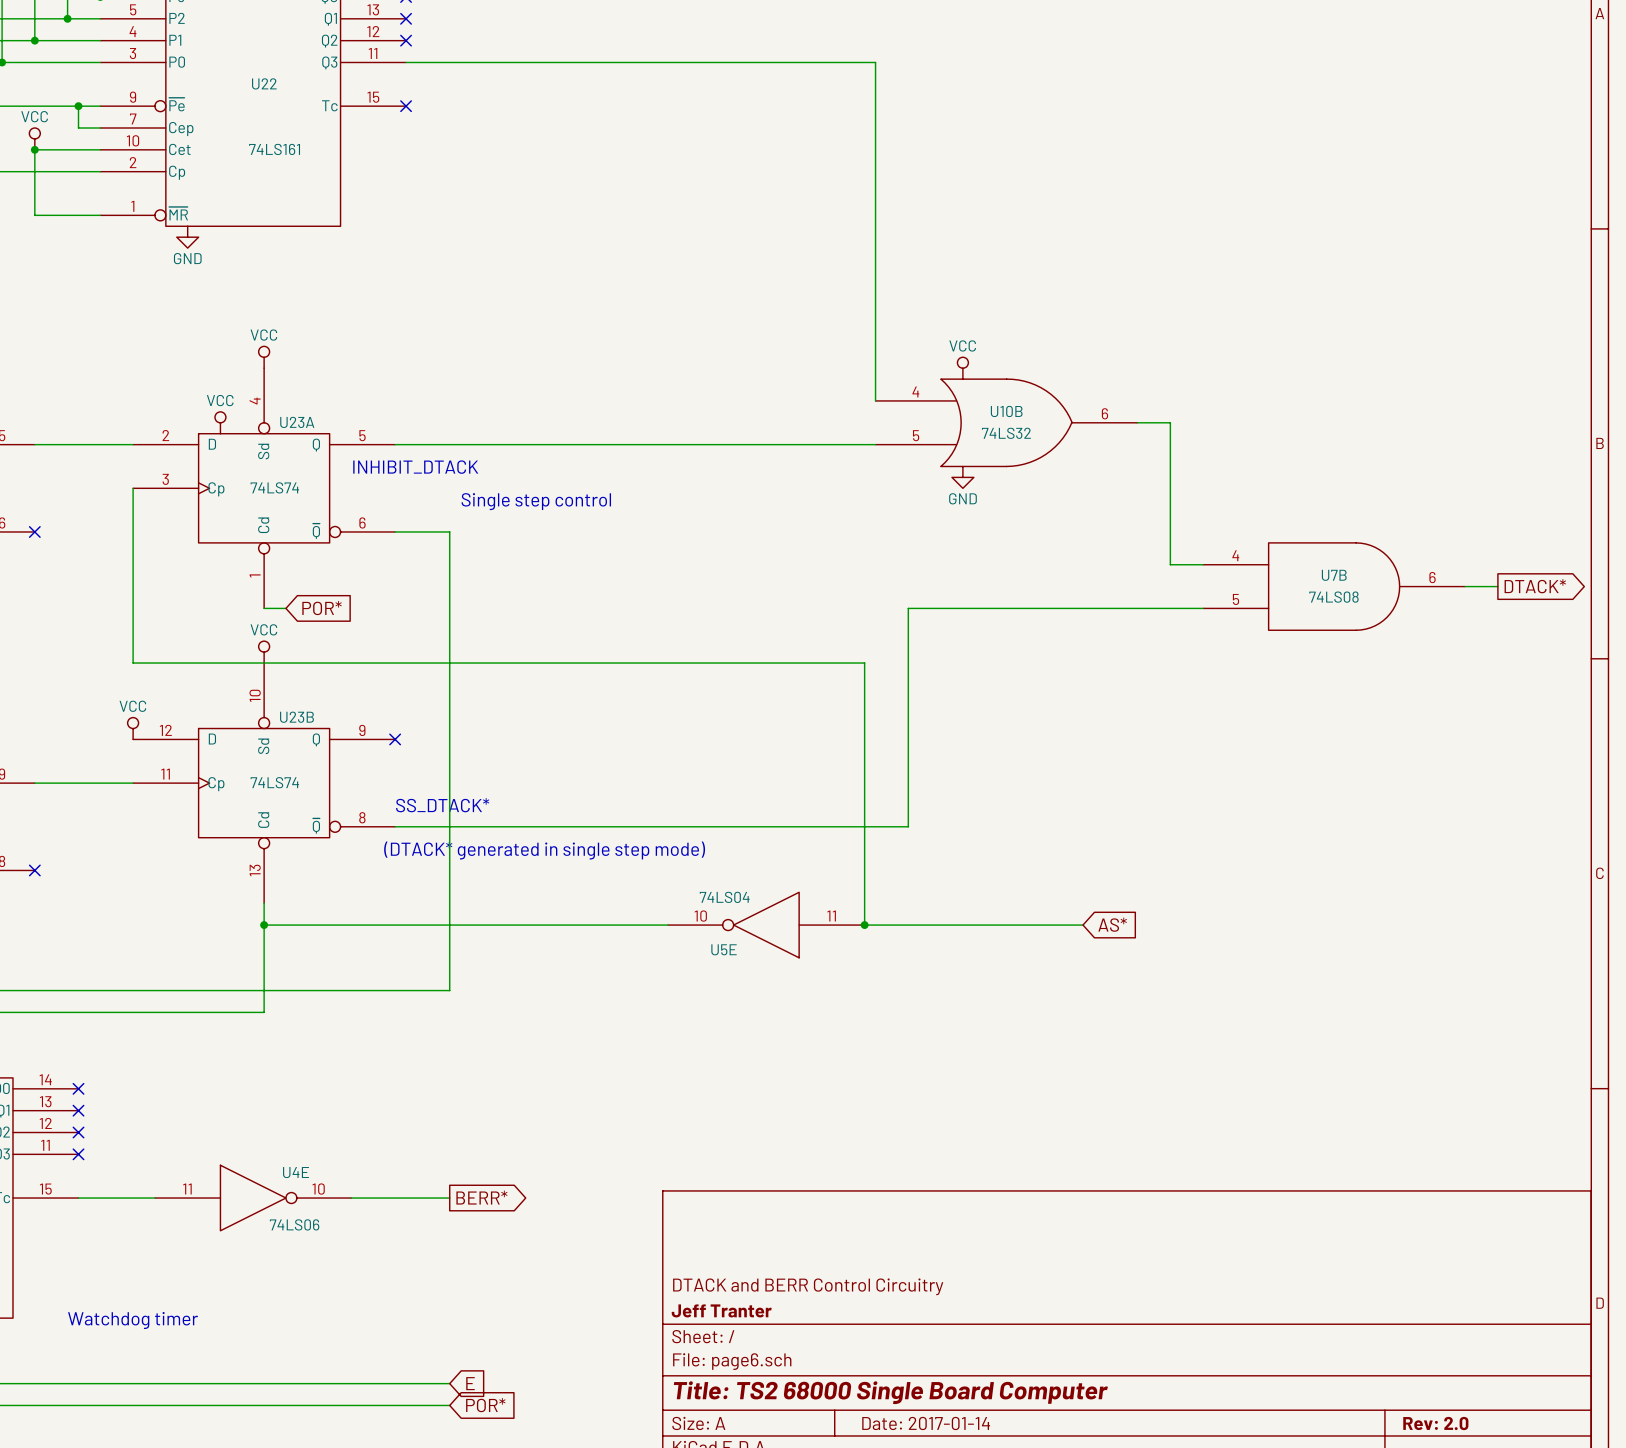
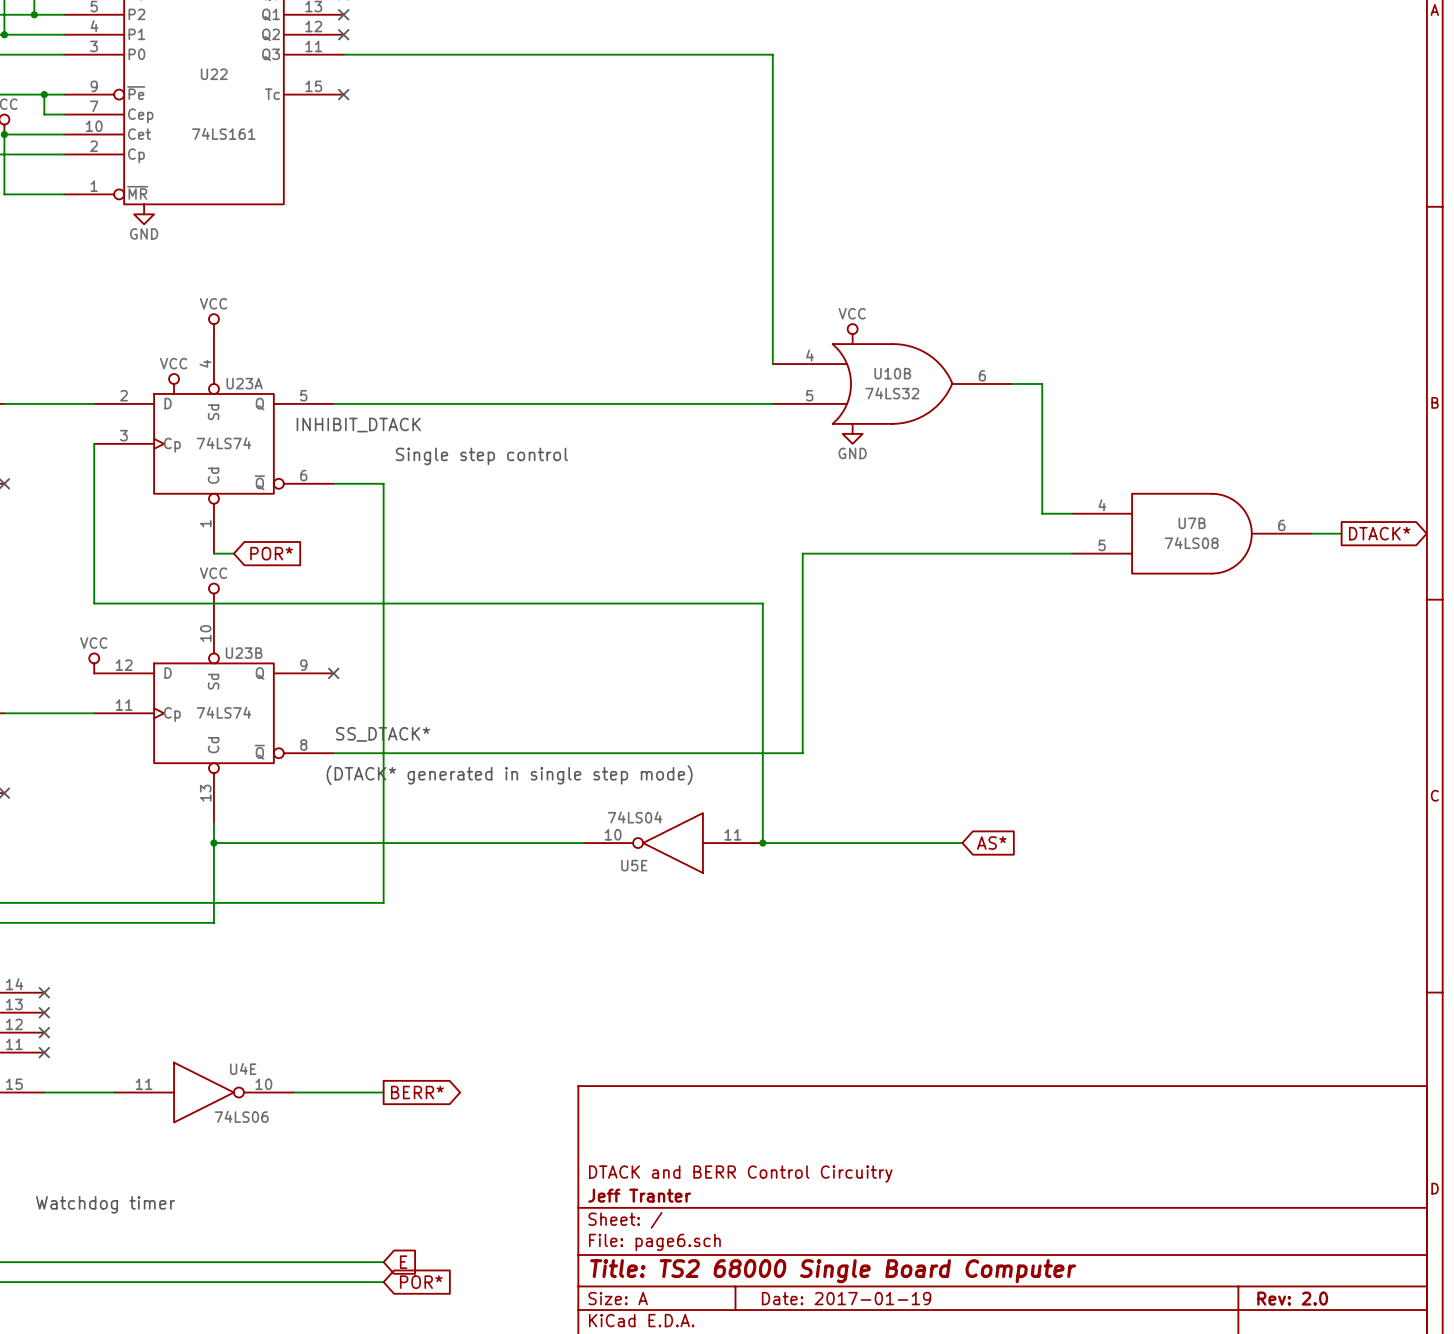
title block: Date: 2017-01-14 (926, 1423) -> Date: 2017-01-19 (846, 1298)

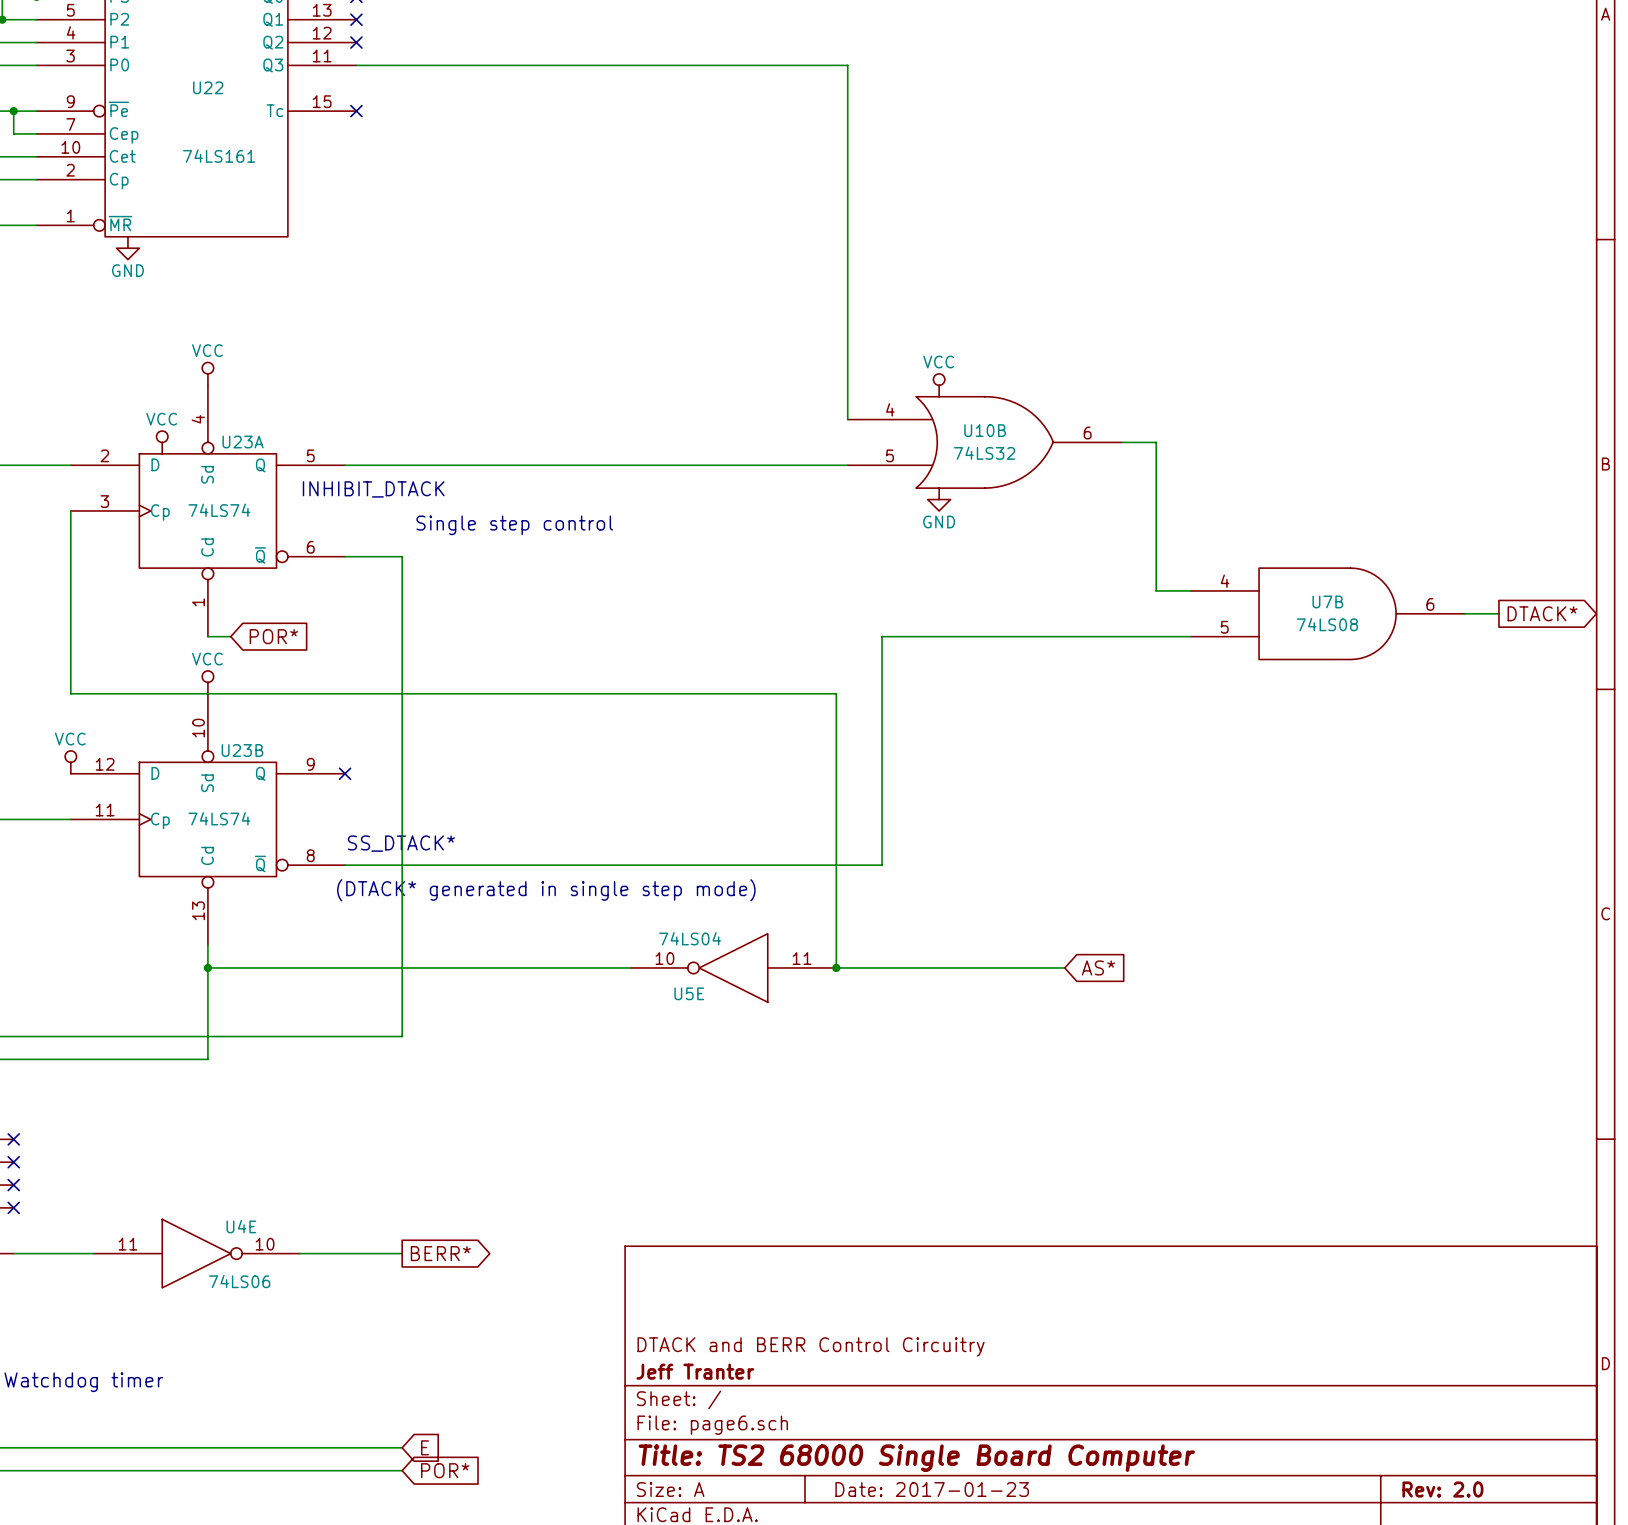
title block: Date: 2017-01-19 (846, 1298) -> Date: 2017-01-23 (932, 1489)

